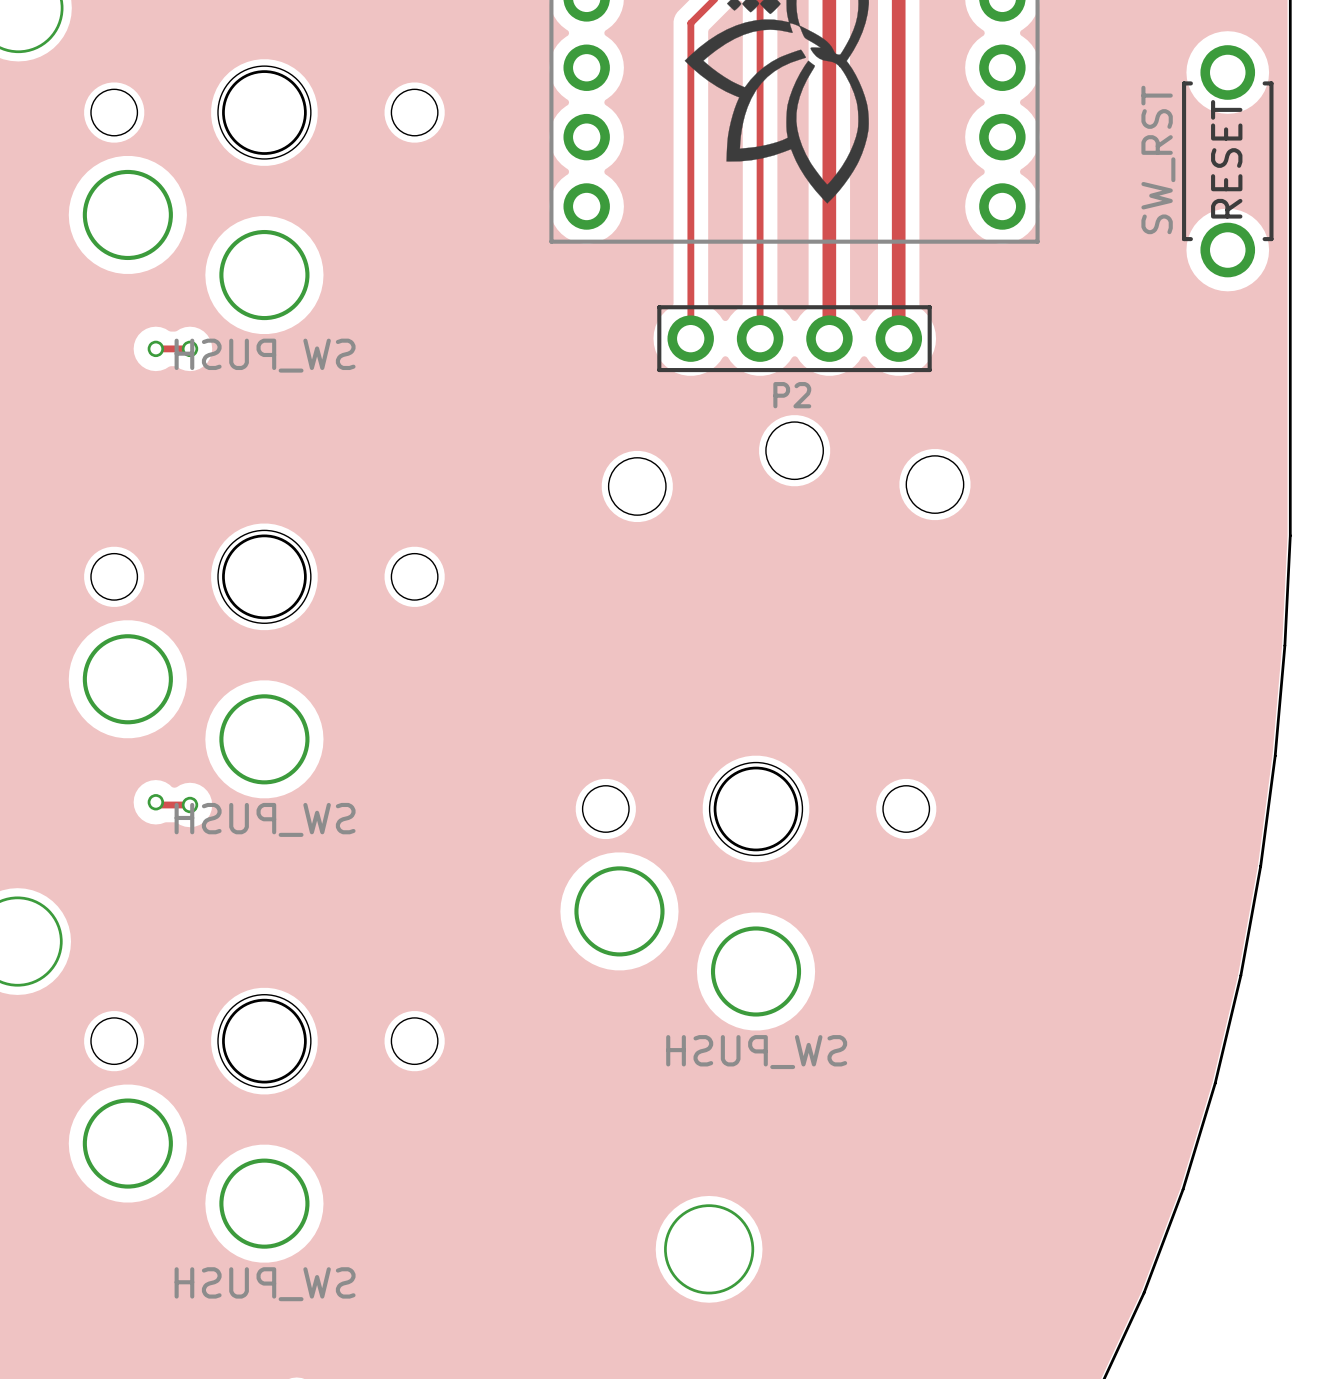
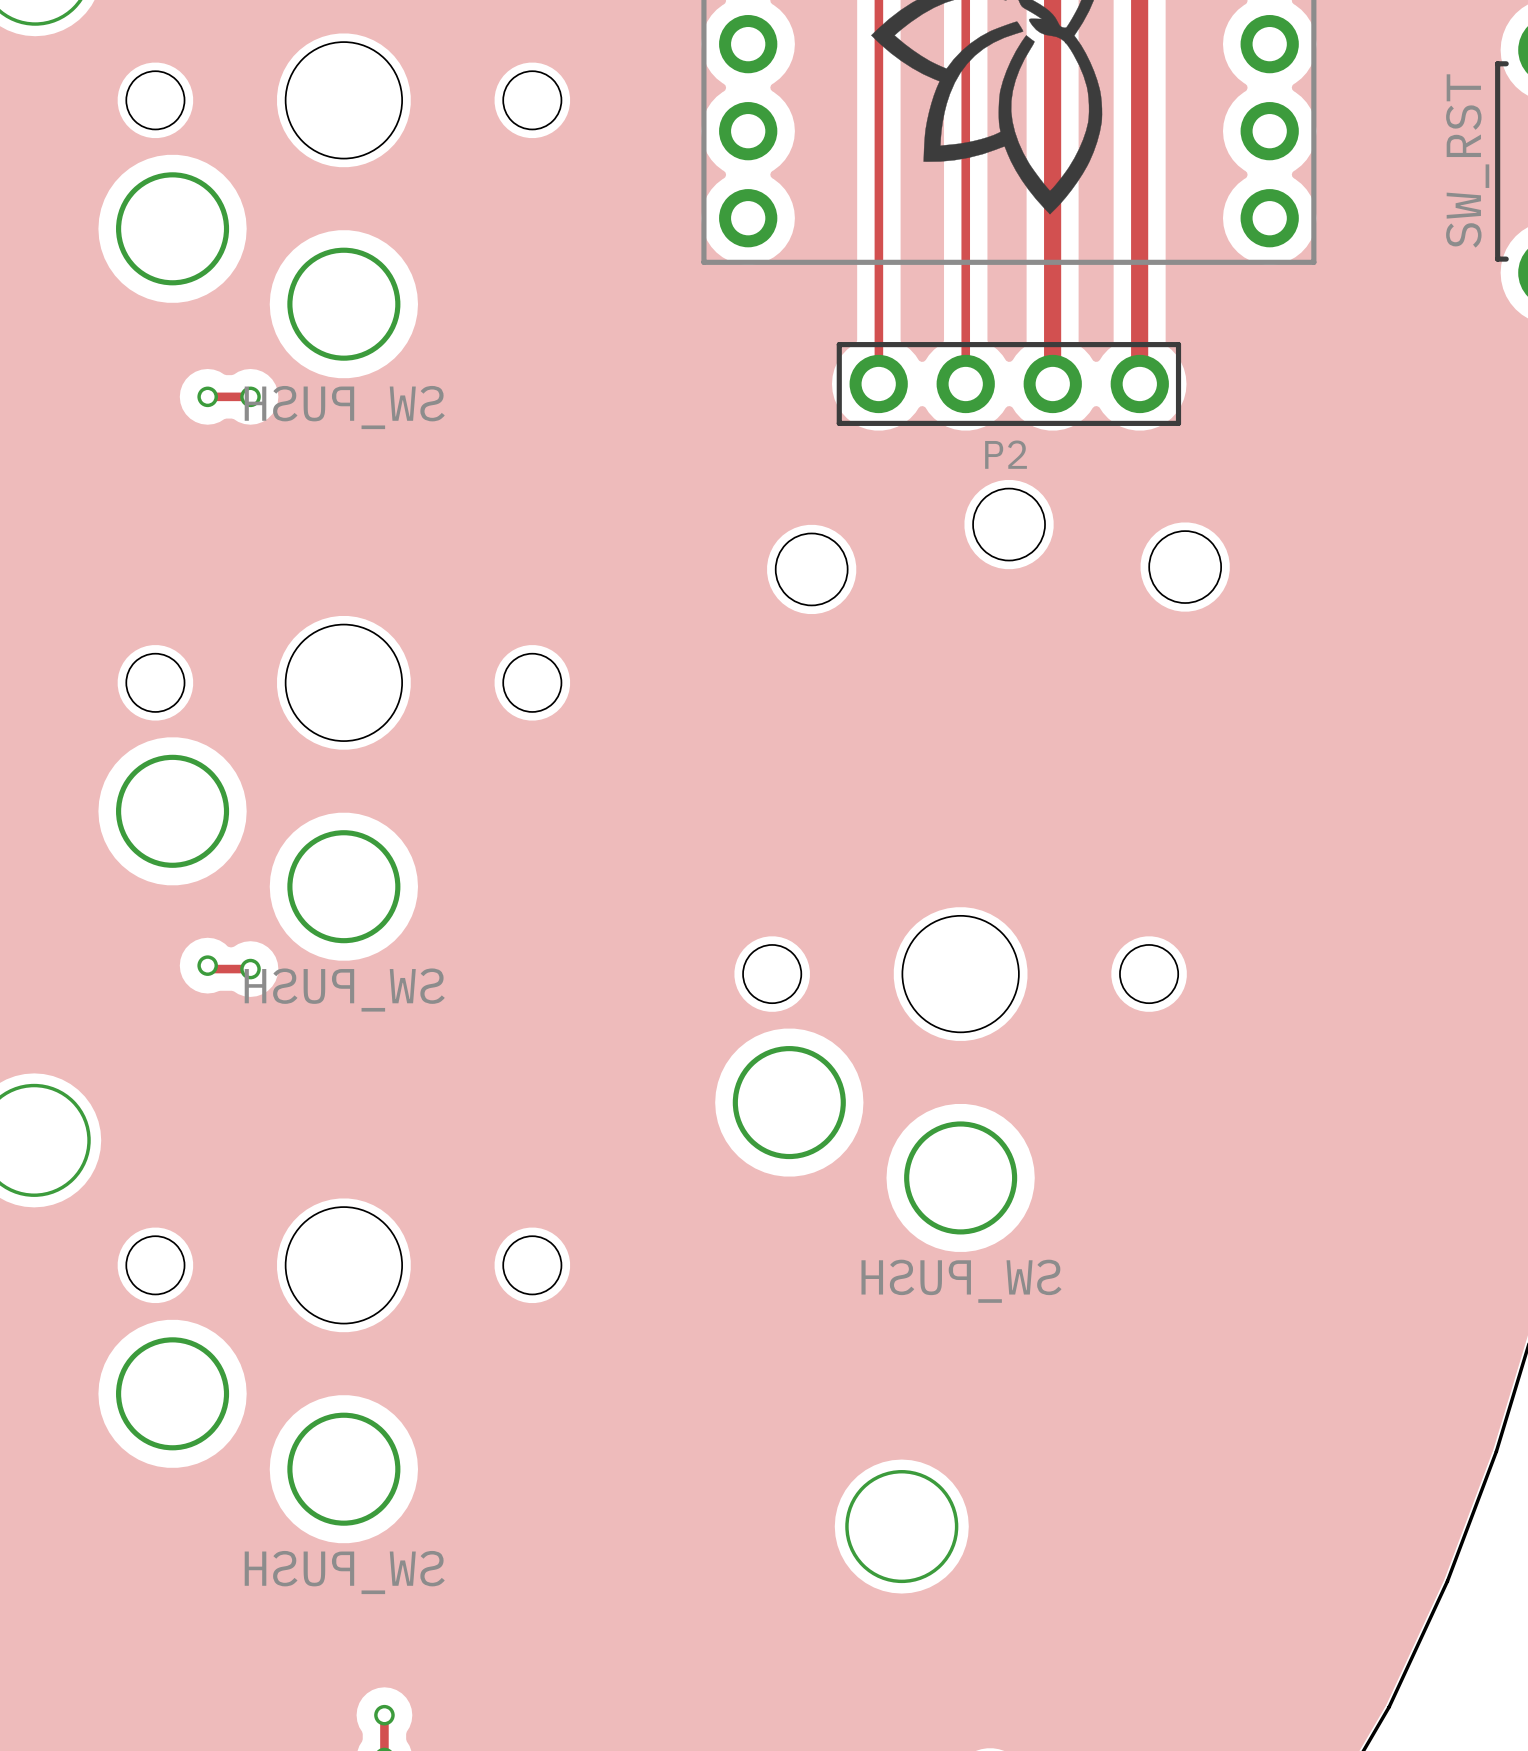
round board edge: [222, 70, 307, 155] -> none
round board edge: [222, 534, 307, 620] -> none
round board edge: [713, 766, 799, 852] -> none
round board edge: [222, 998, 307, 1084] -> none

